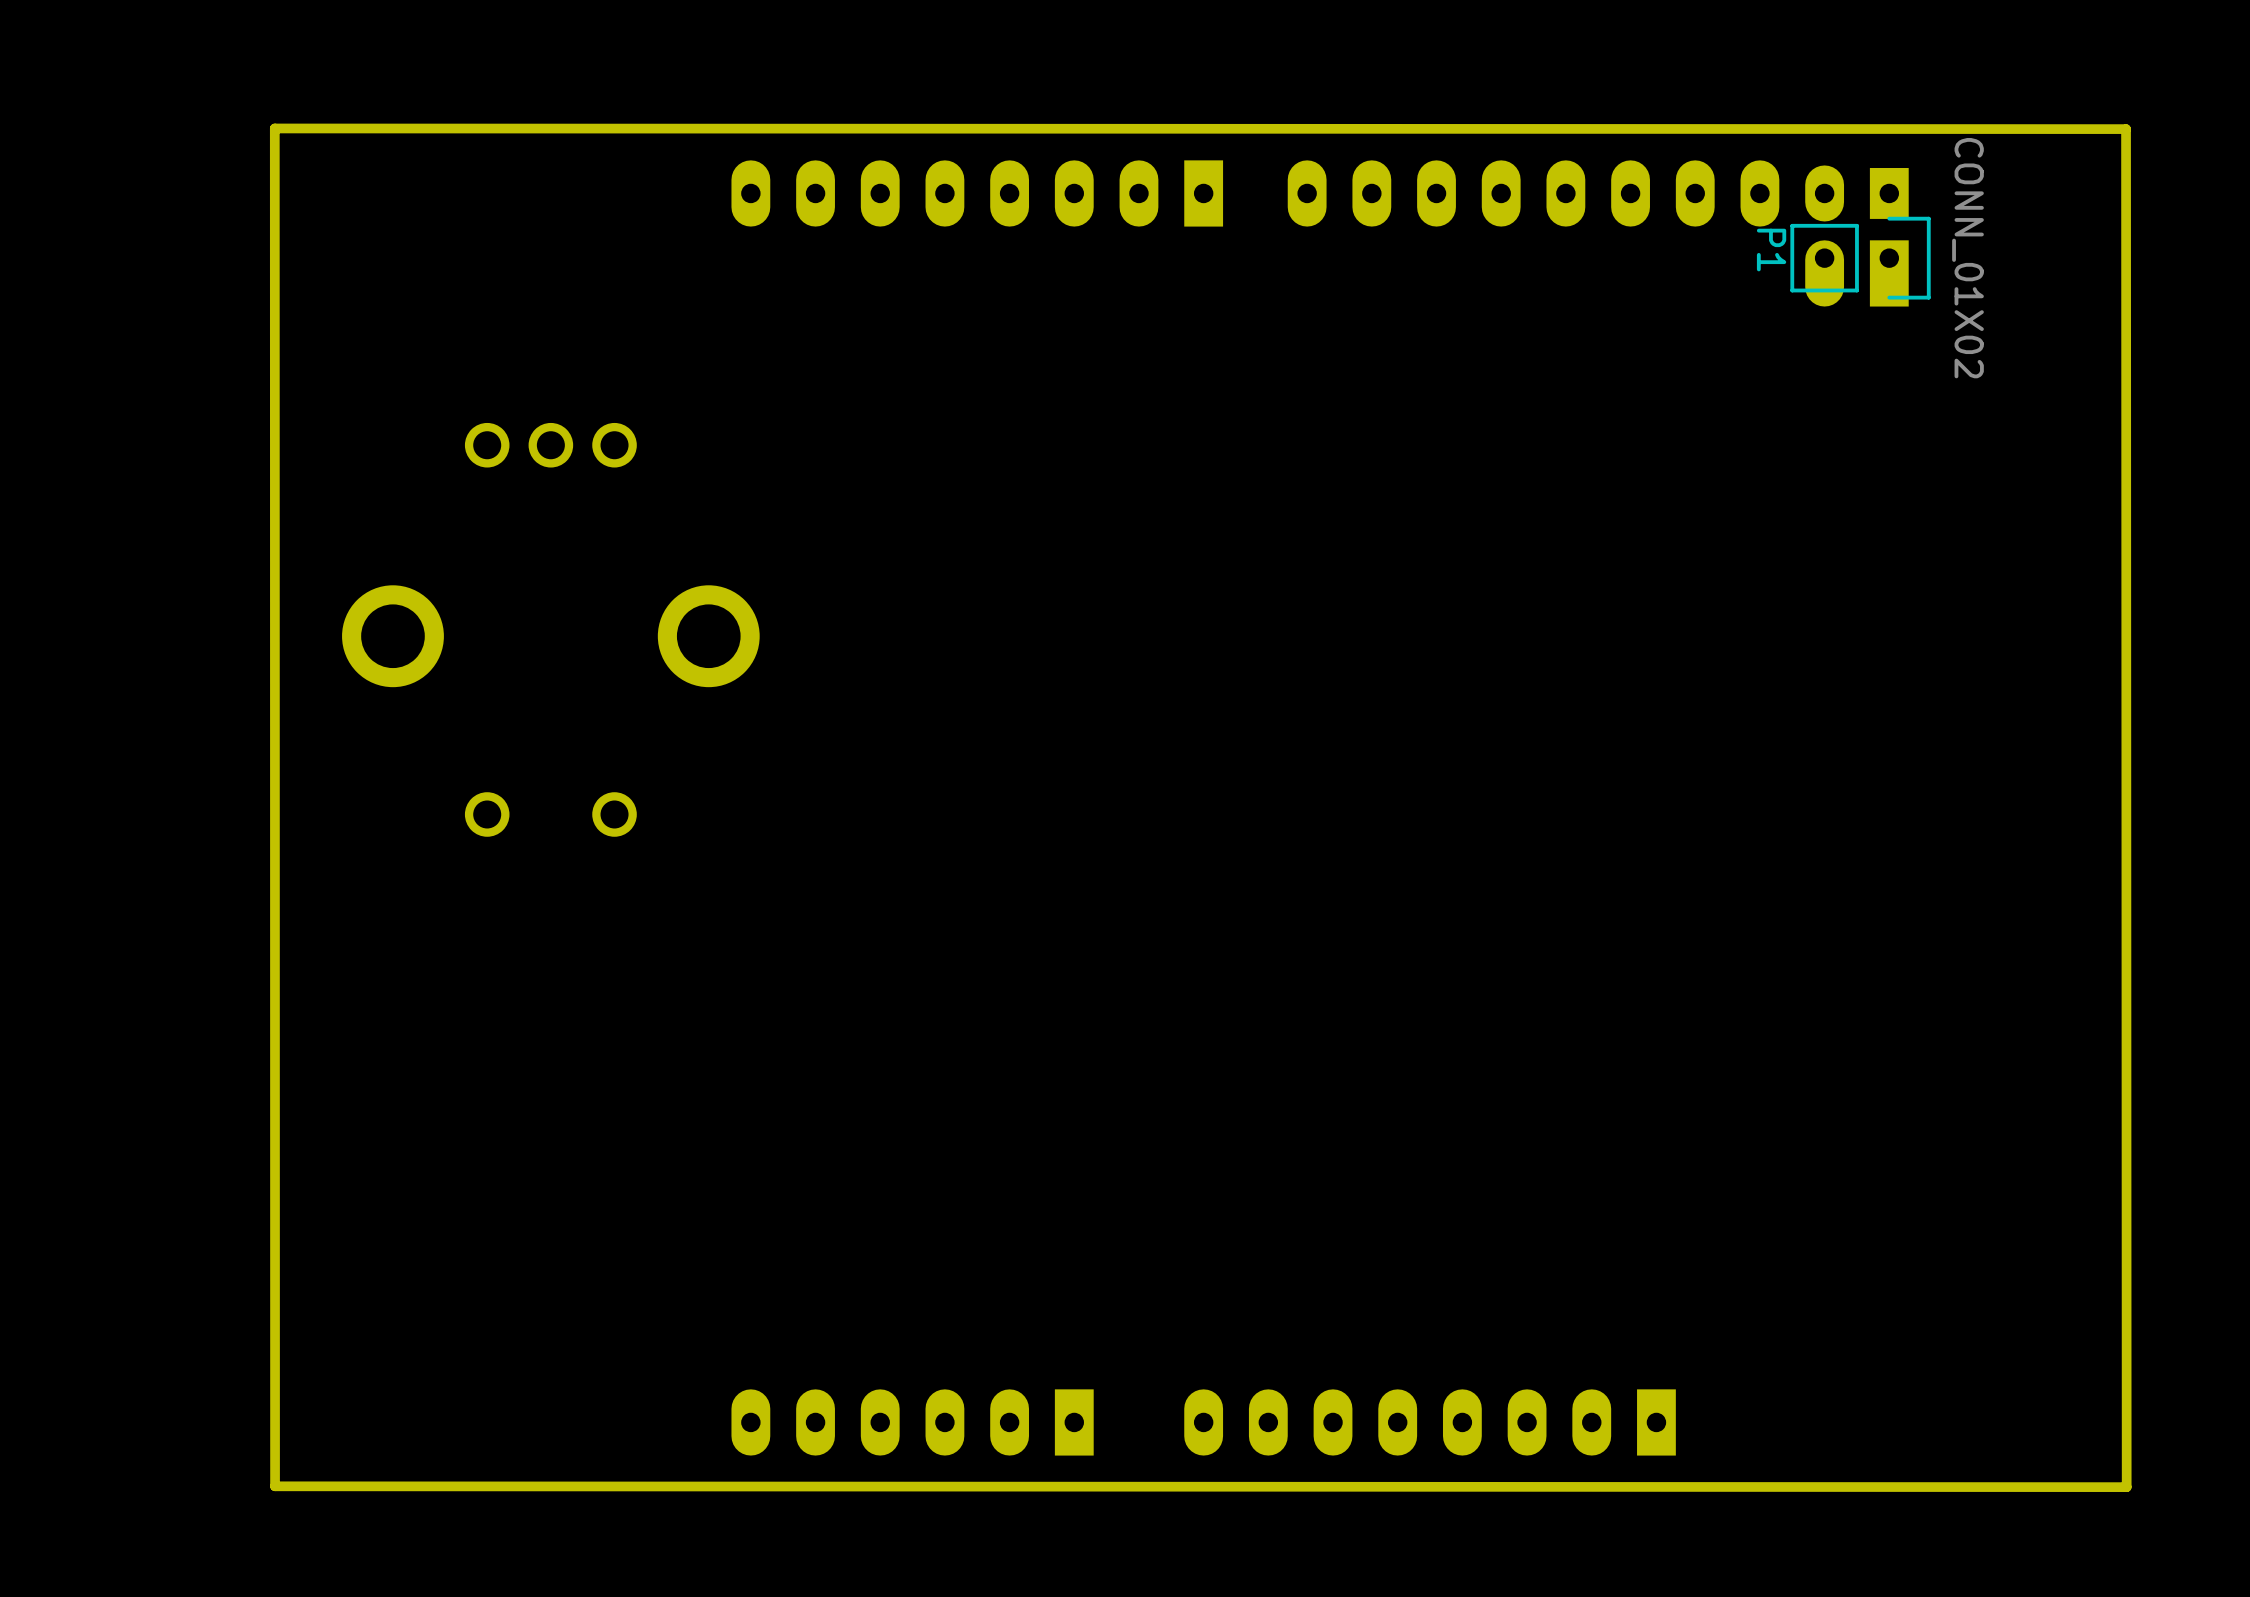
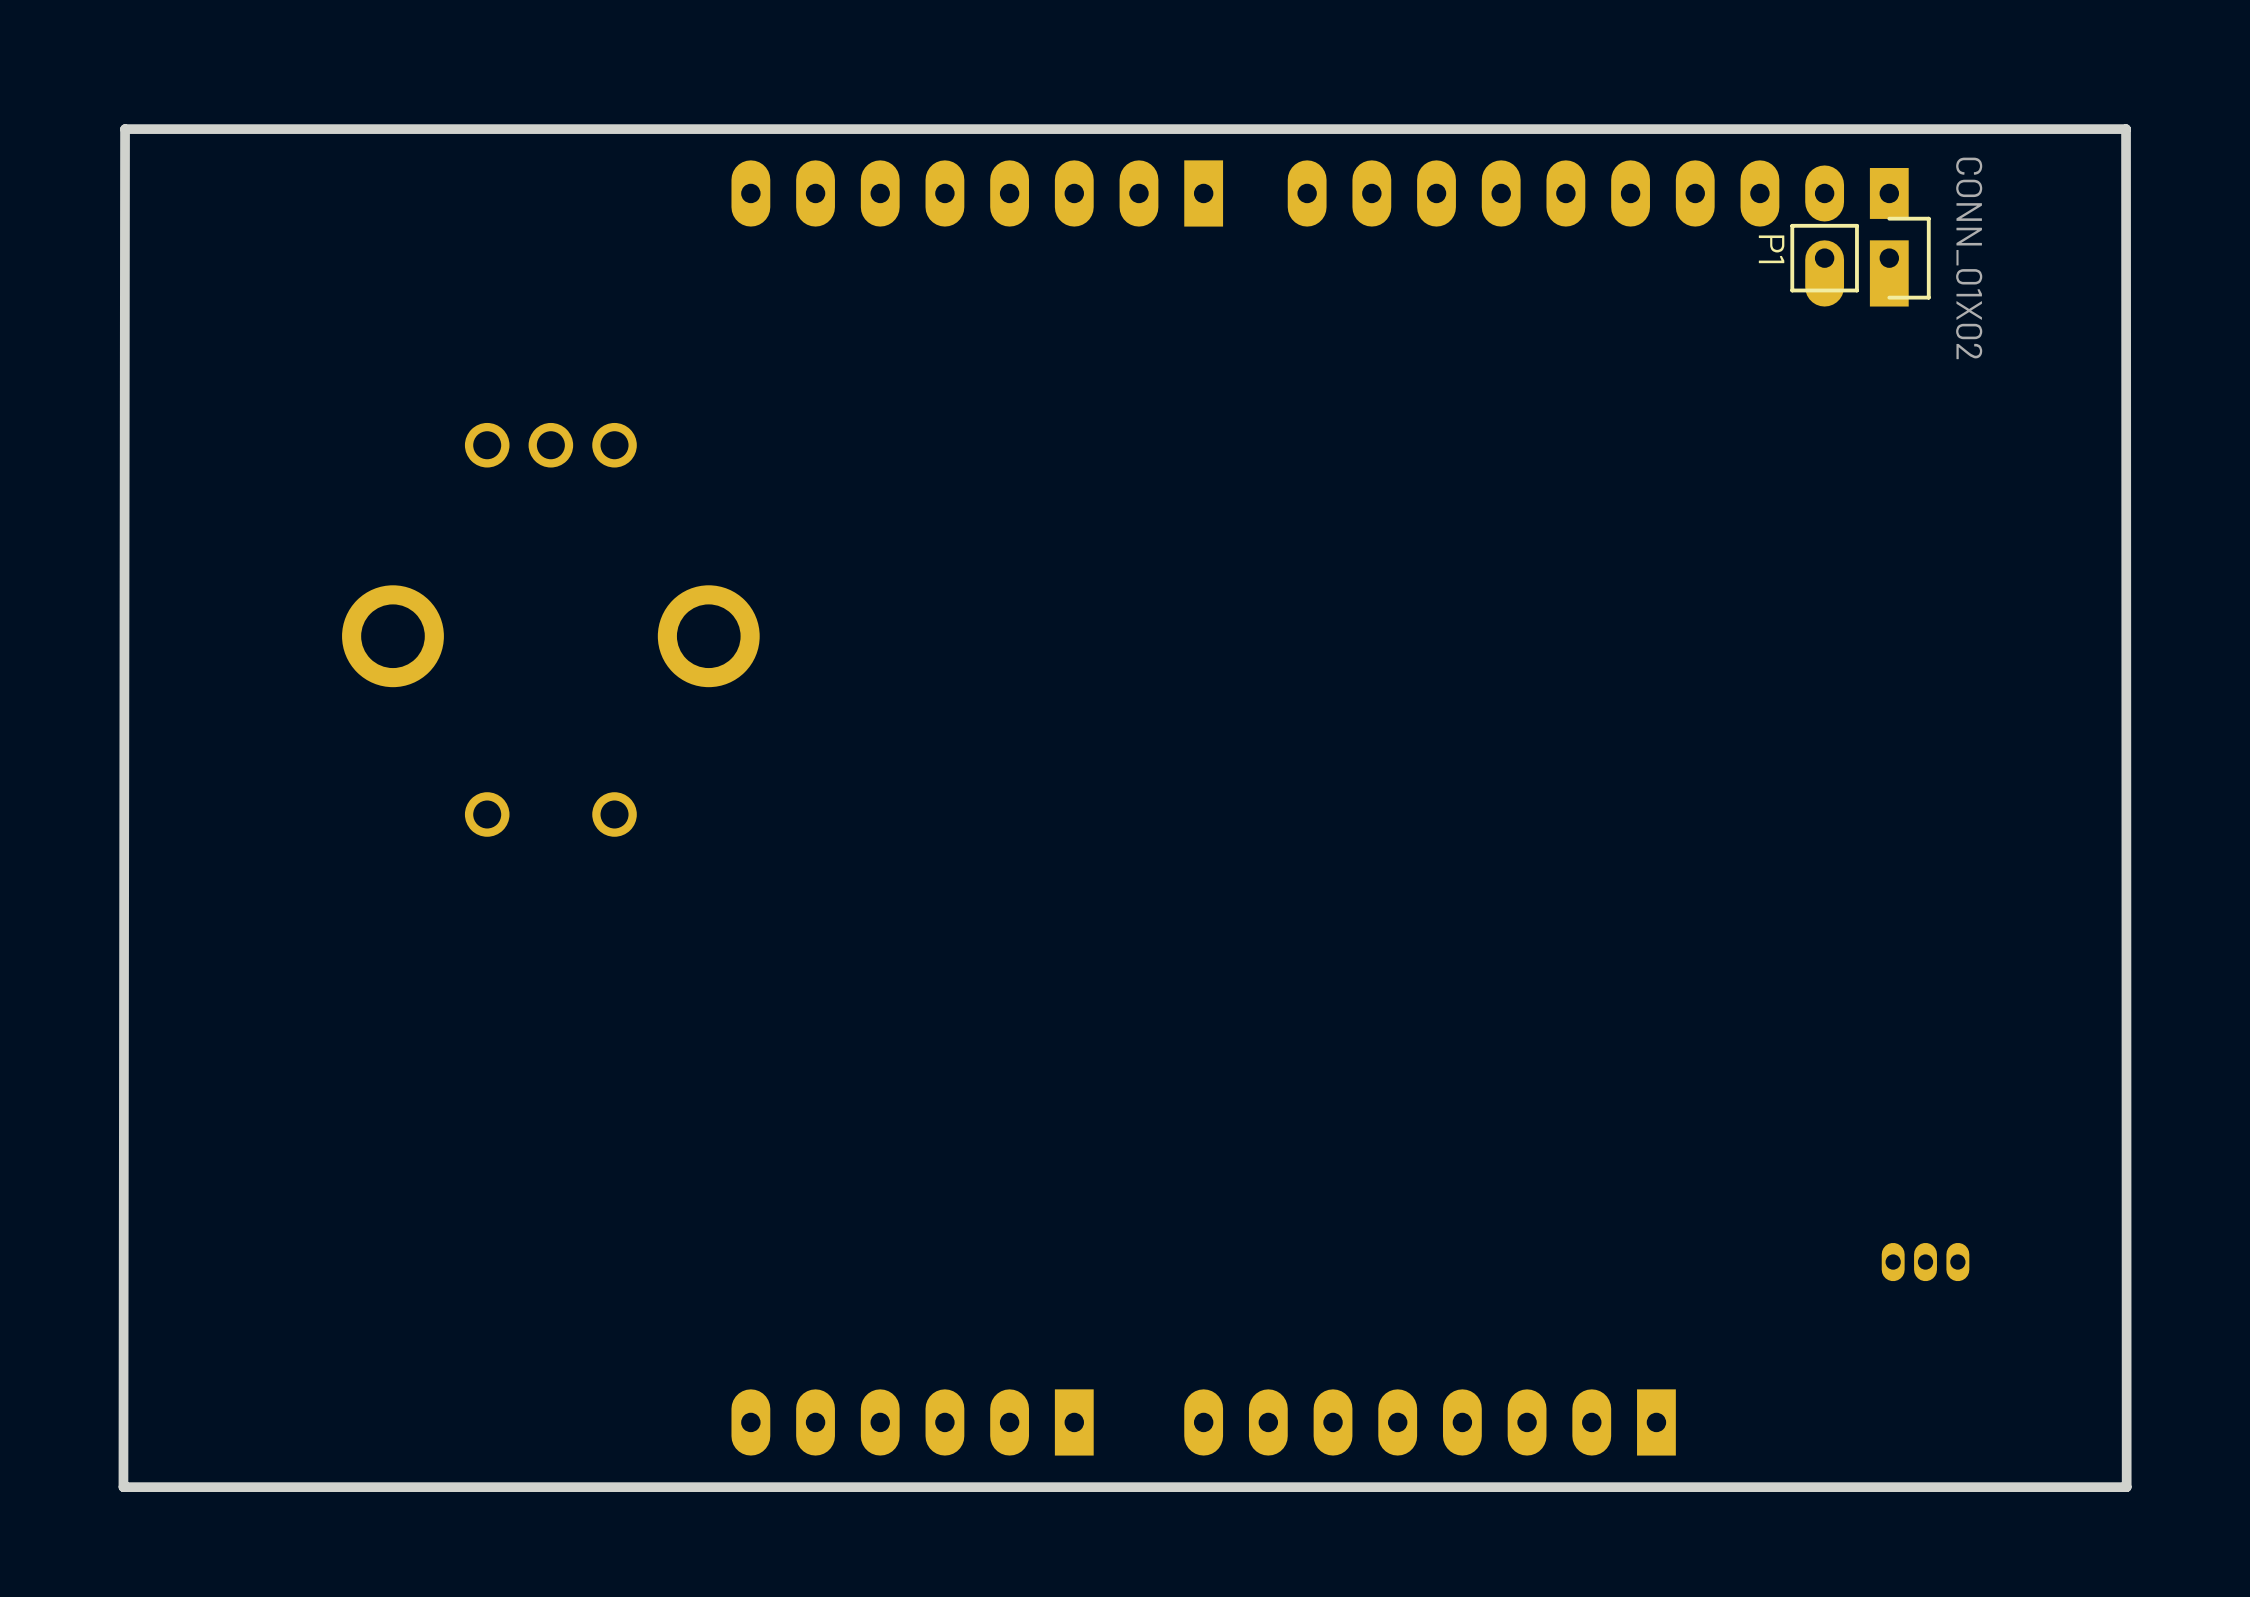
board edge: (2126, 129) (274, 128) (275, 1486) (2126, 1487) -> (2126, 129) (125, 129) (123, 1487) (2126, 1487)
part: none -> (1925, 1262)

